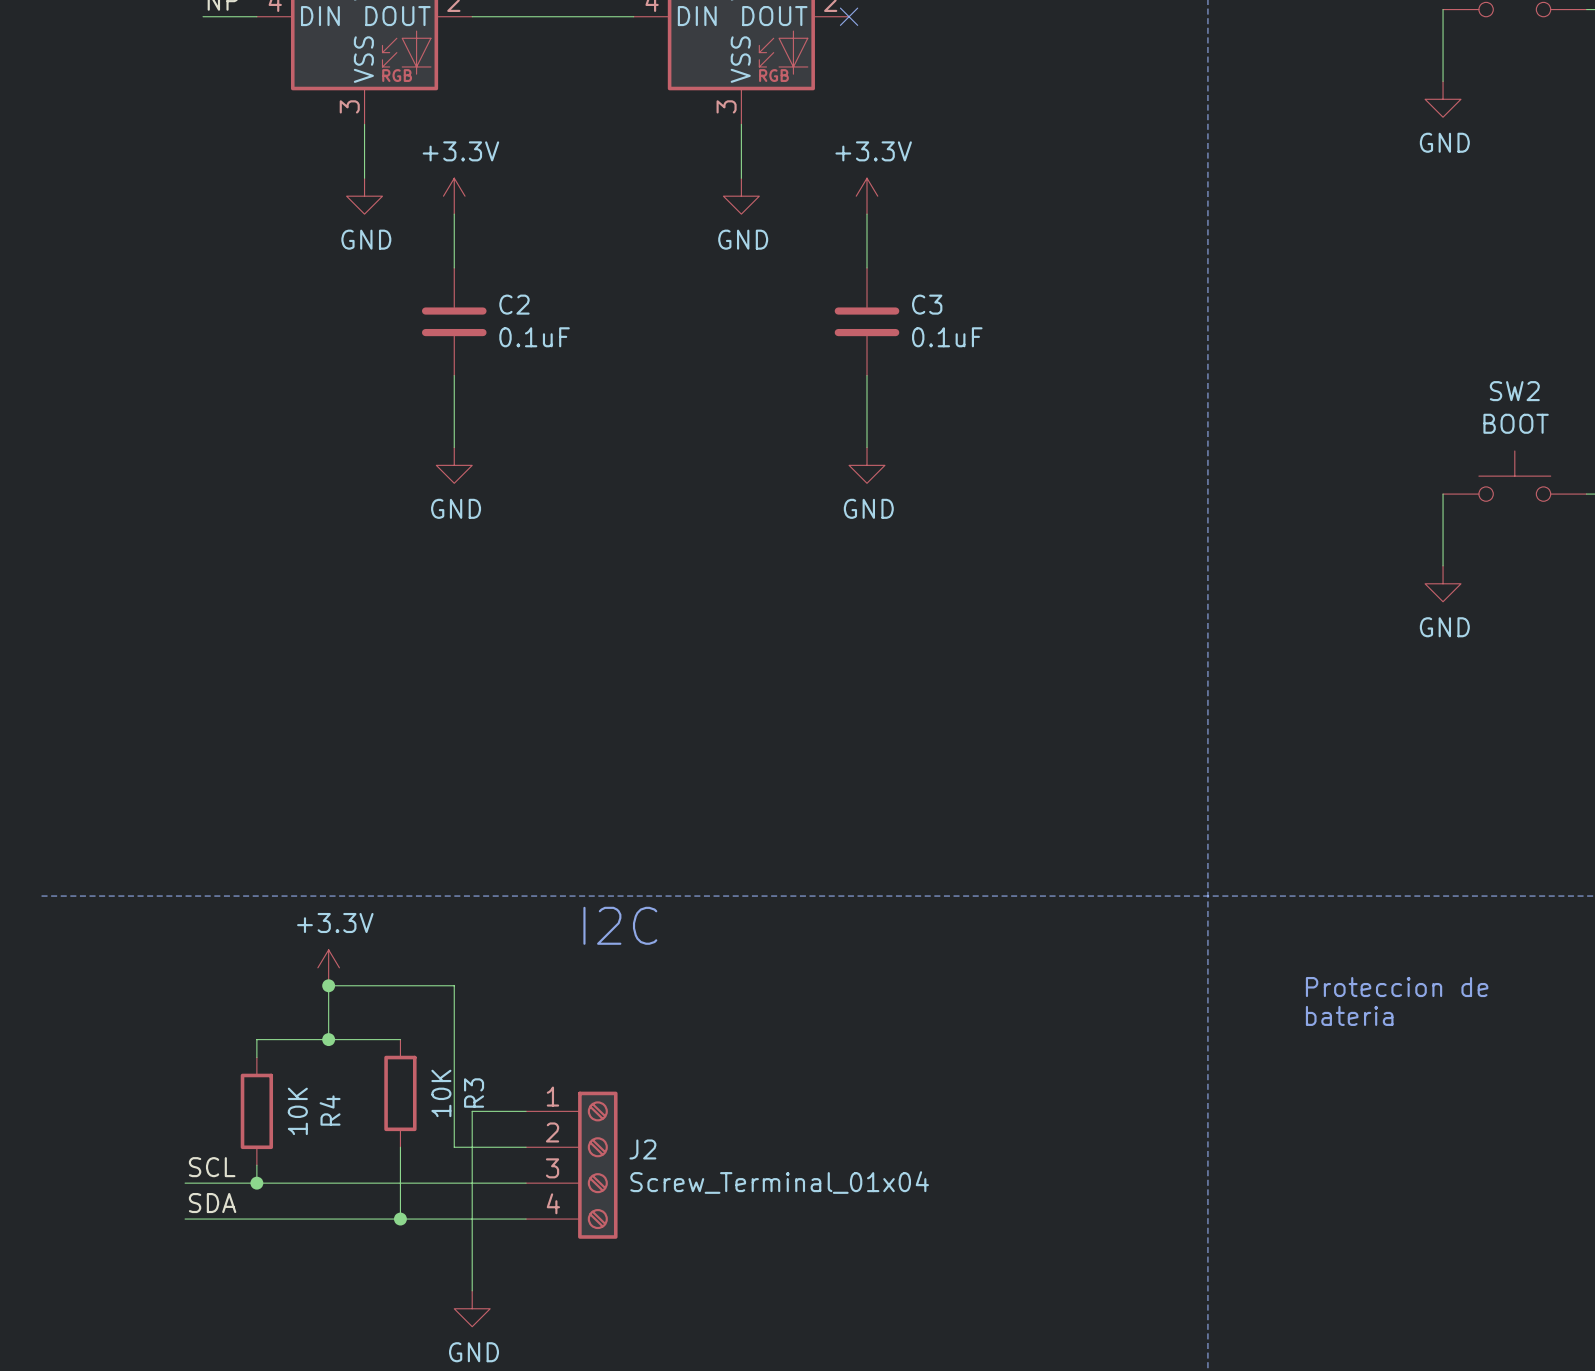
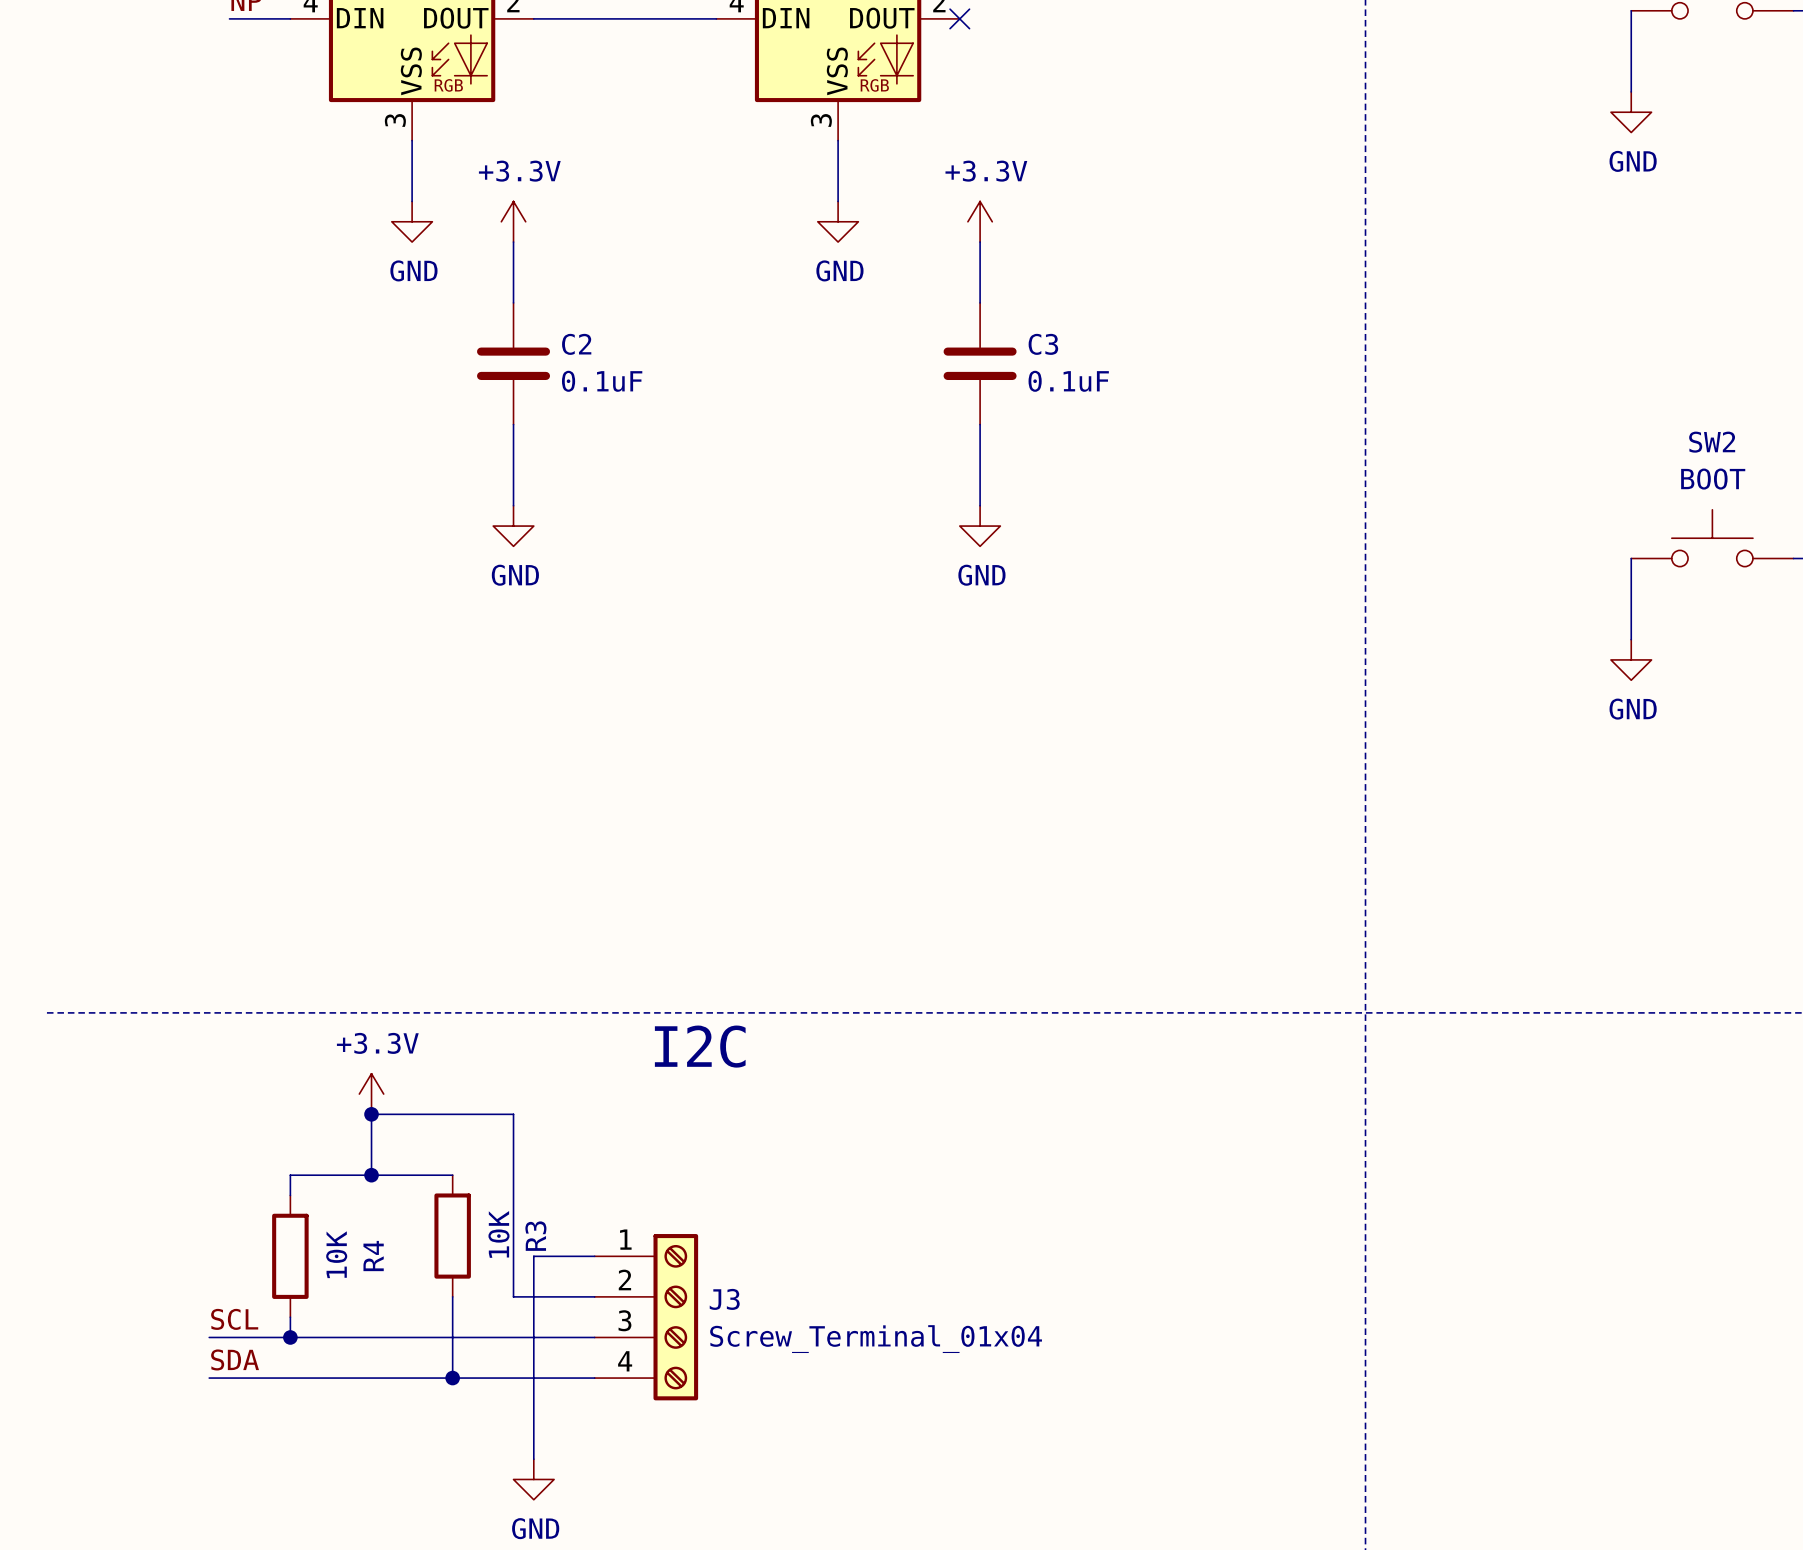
text: Proteccion de (1397, 987) -> none
text: bateria (1349, 1015) -> none
J2 name: J2 (642, 1149) -> J3 (724, 1299)

